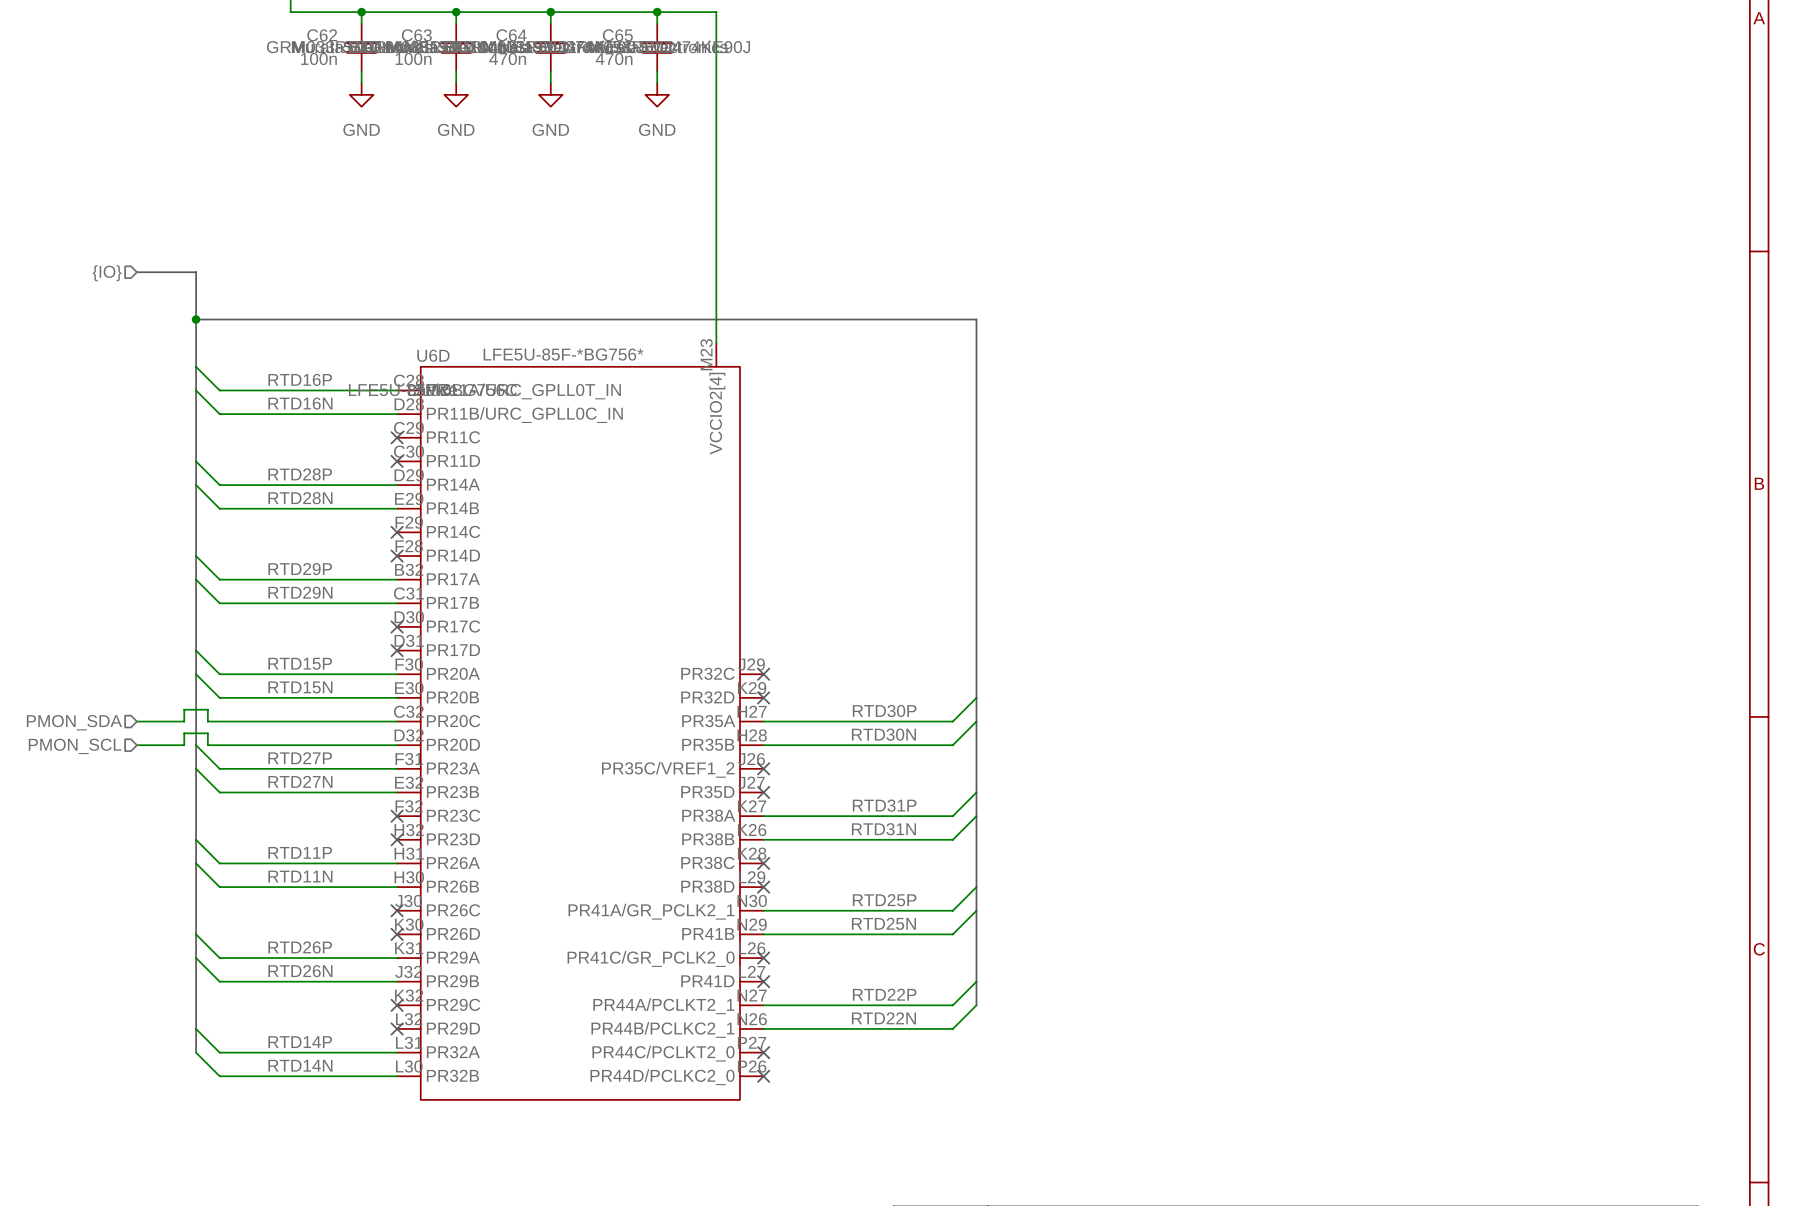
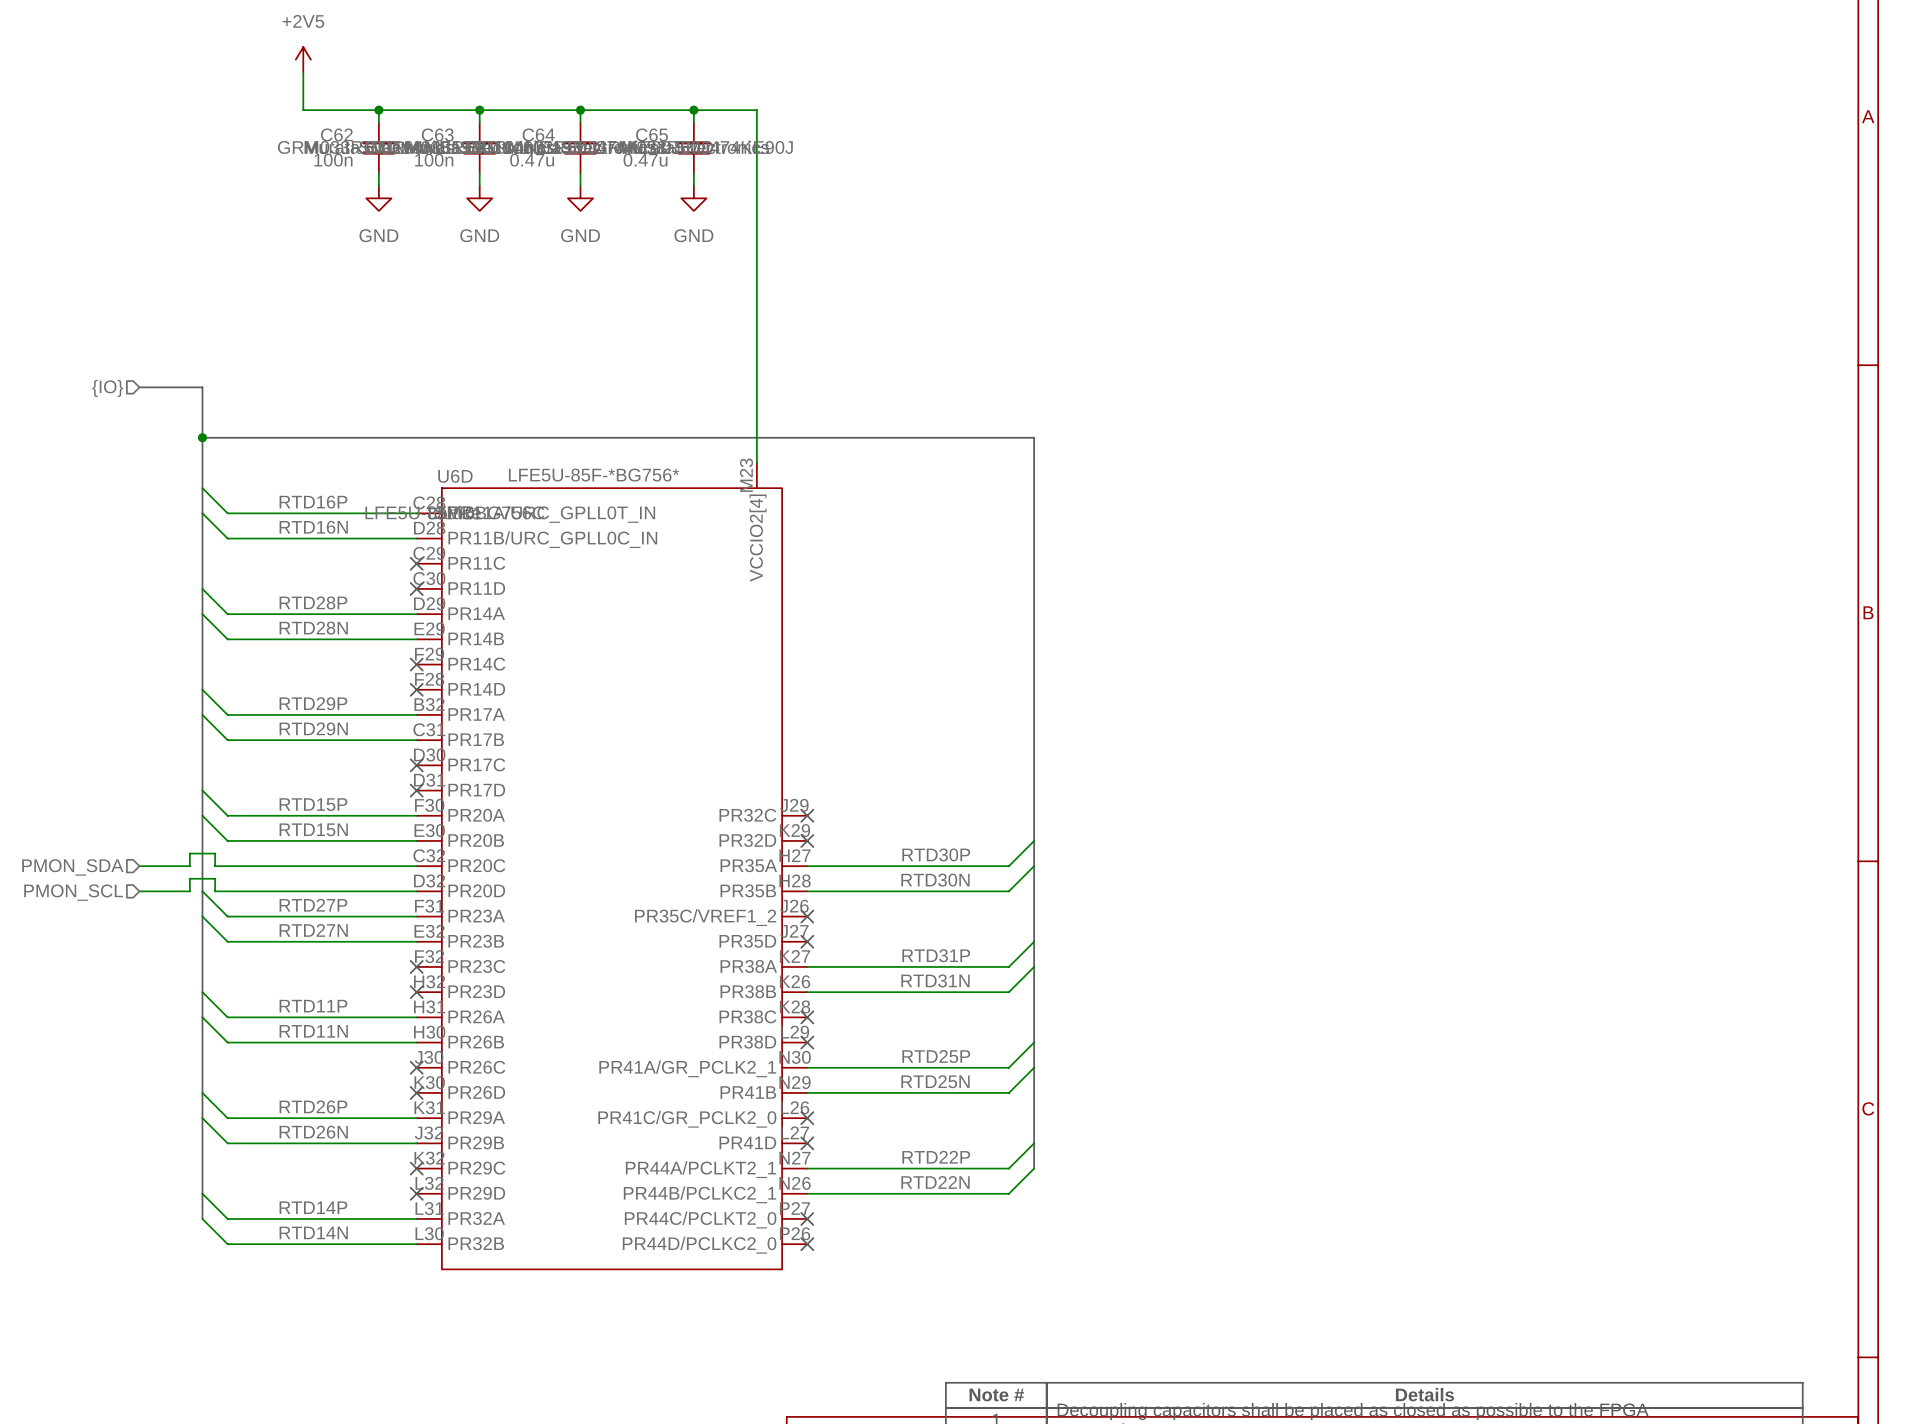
C64 value: 470n (507, 59) -> 0.47u (532, 160)
C65 value: 470n (614, 59) -> 0.47u (645, 160)

